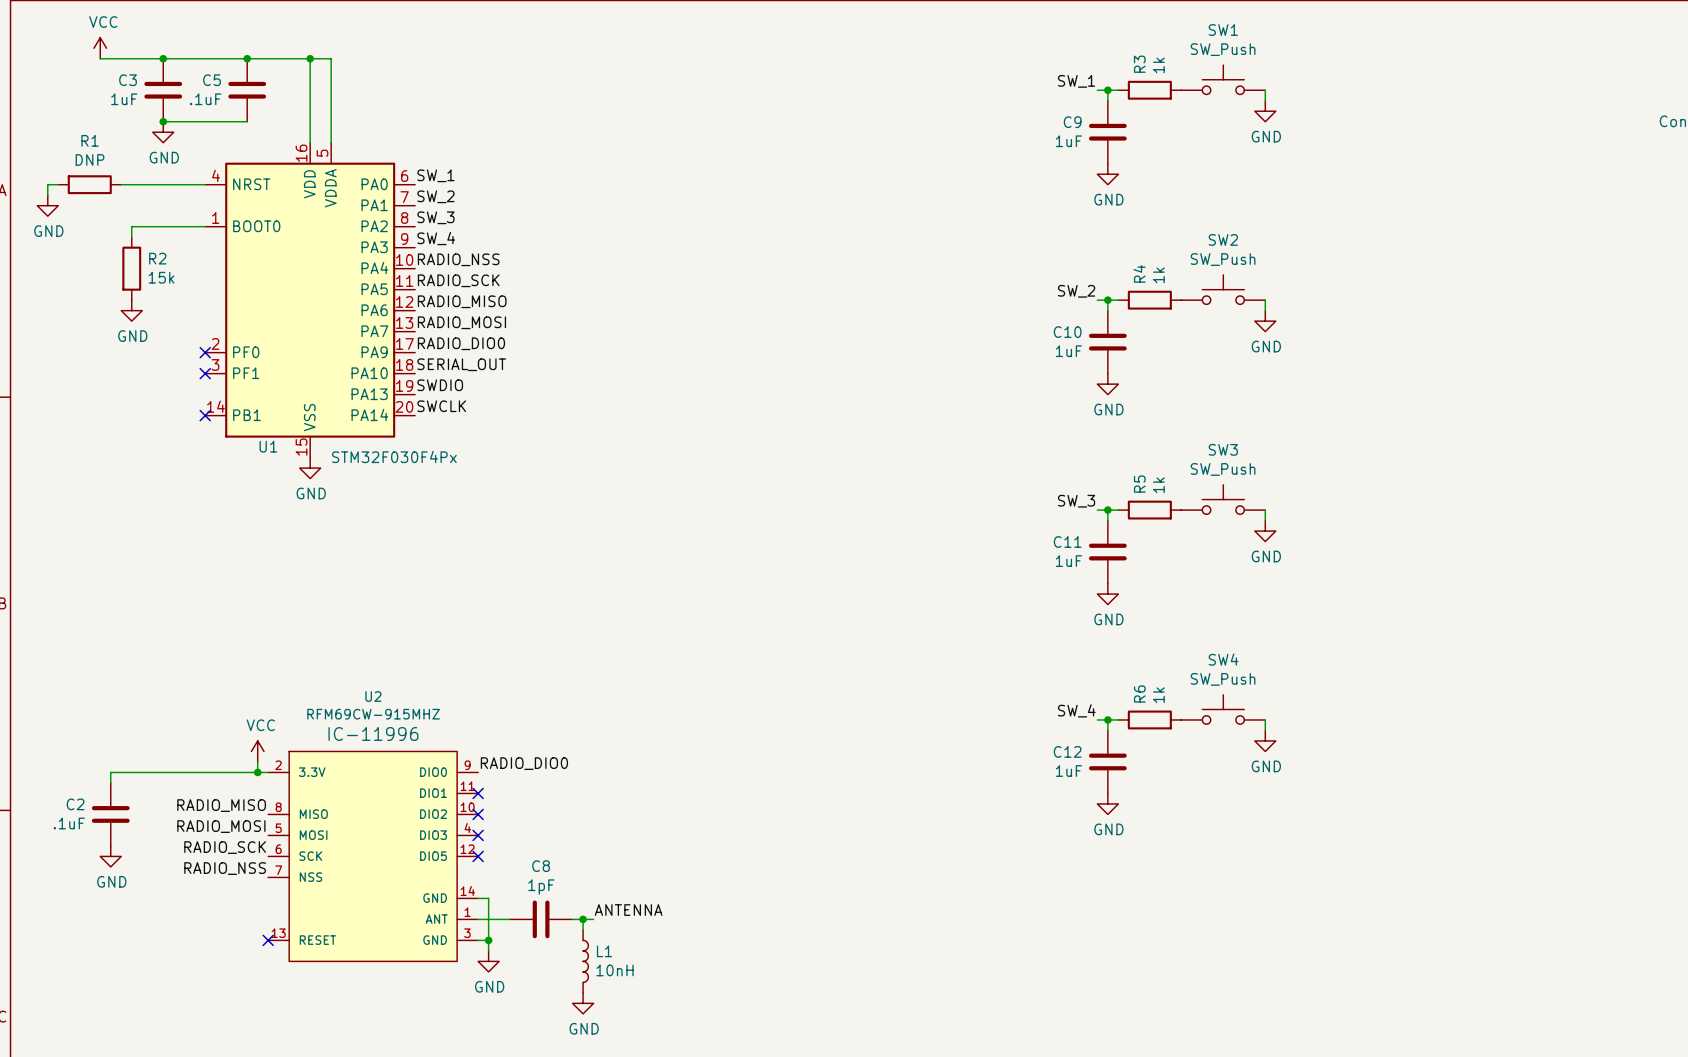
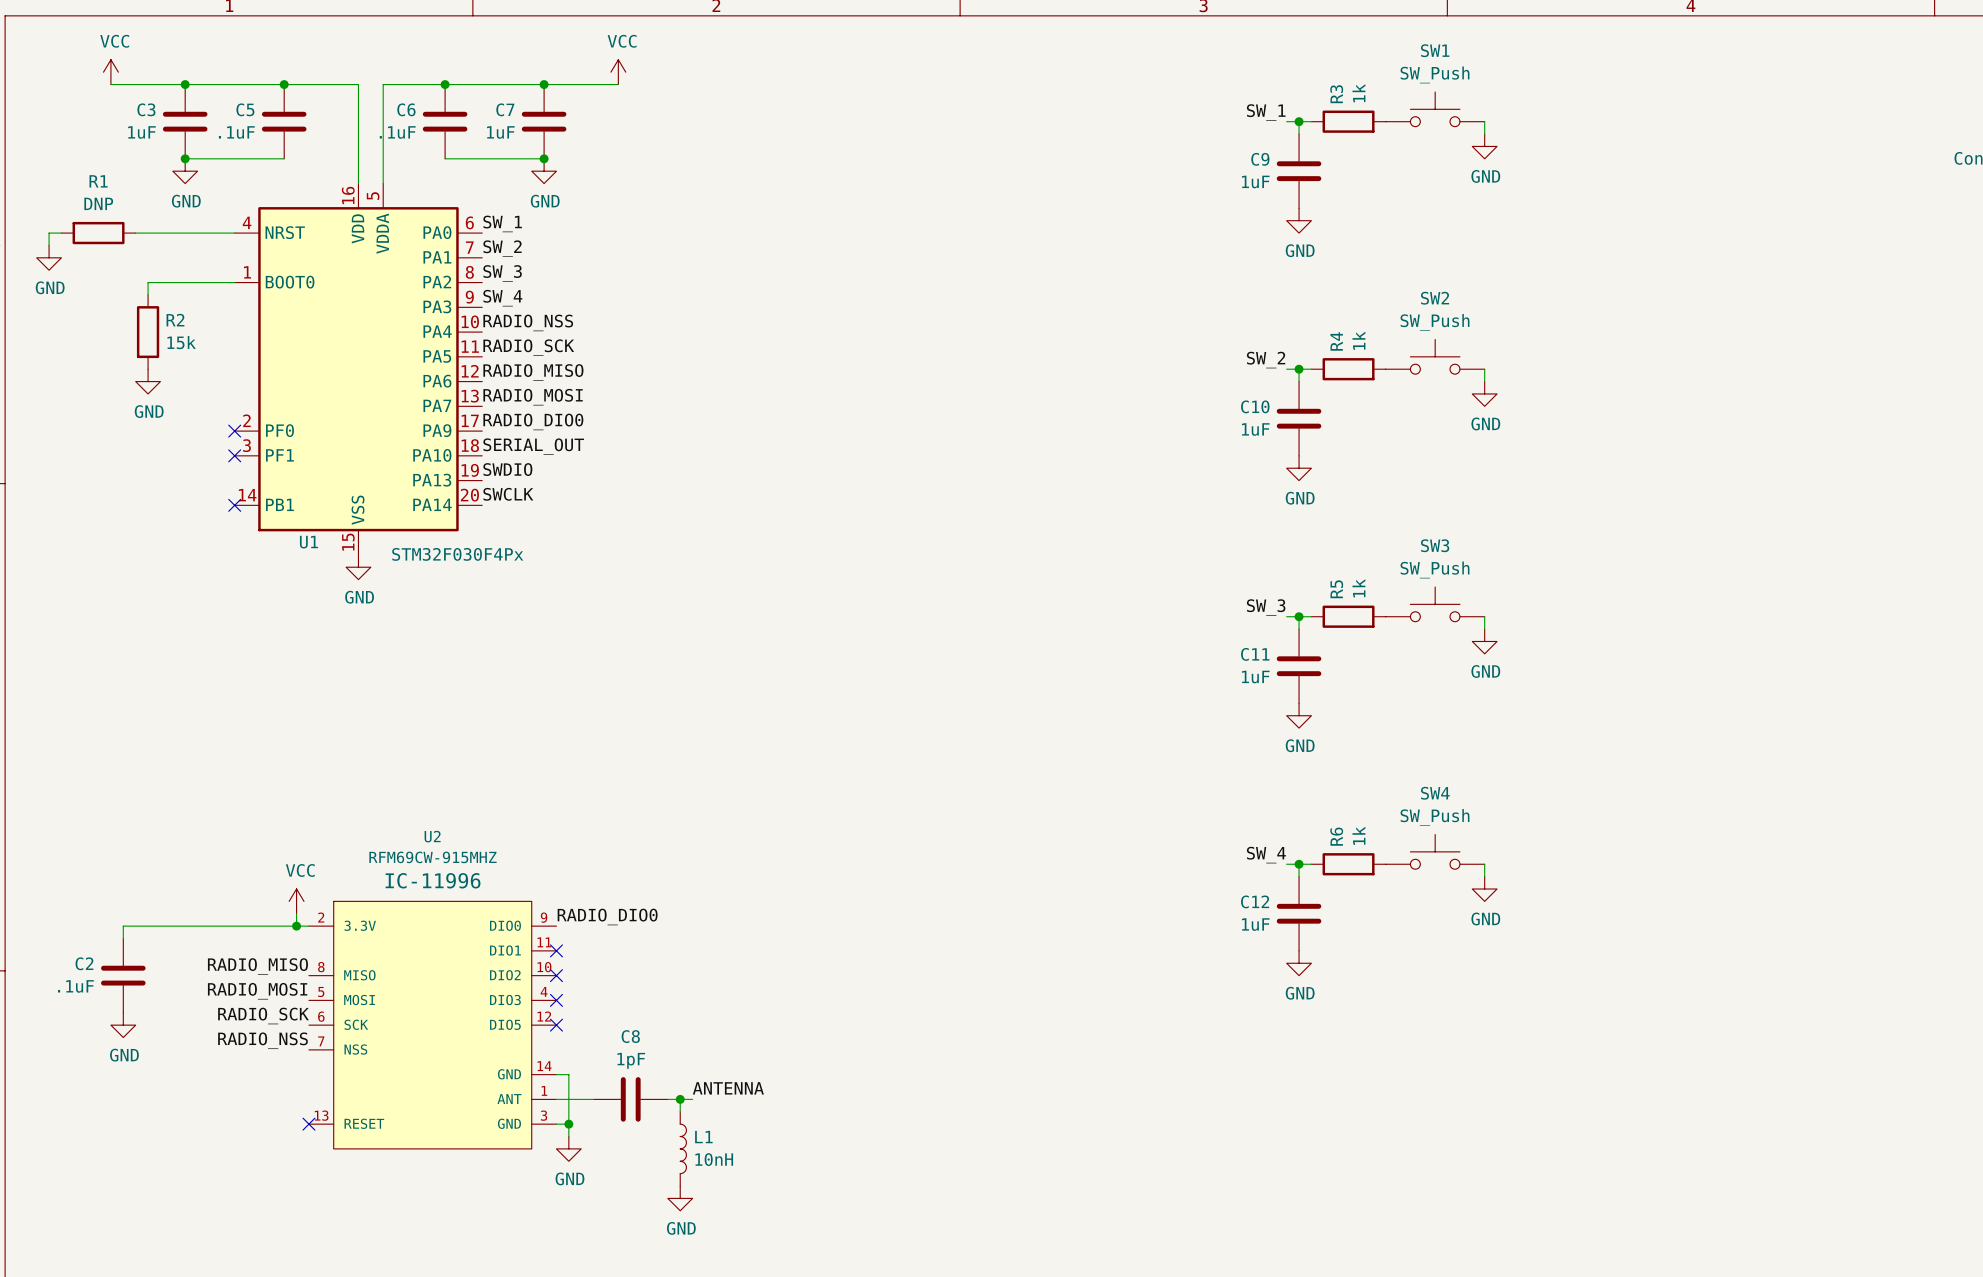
power symbol: none -> VCC (618, 72)
wire: (310, 58) (331, 58) -> (618, 84) (383, 84)
junction: (310, 58) -> none
junction: none -> (445, 84)
junction: none -> (544, 84)
C6: none -> .1uF (445, 121)
C7: none -> 1uF (544, 121)
wire: none -> (445, 158) (544, 158)
junction: none -> (544, 158)
power symbol: none -> GND (544, 171)

